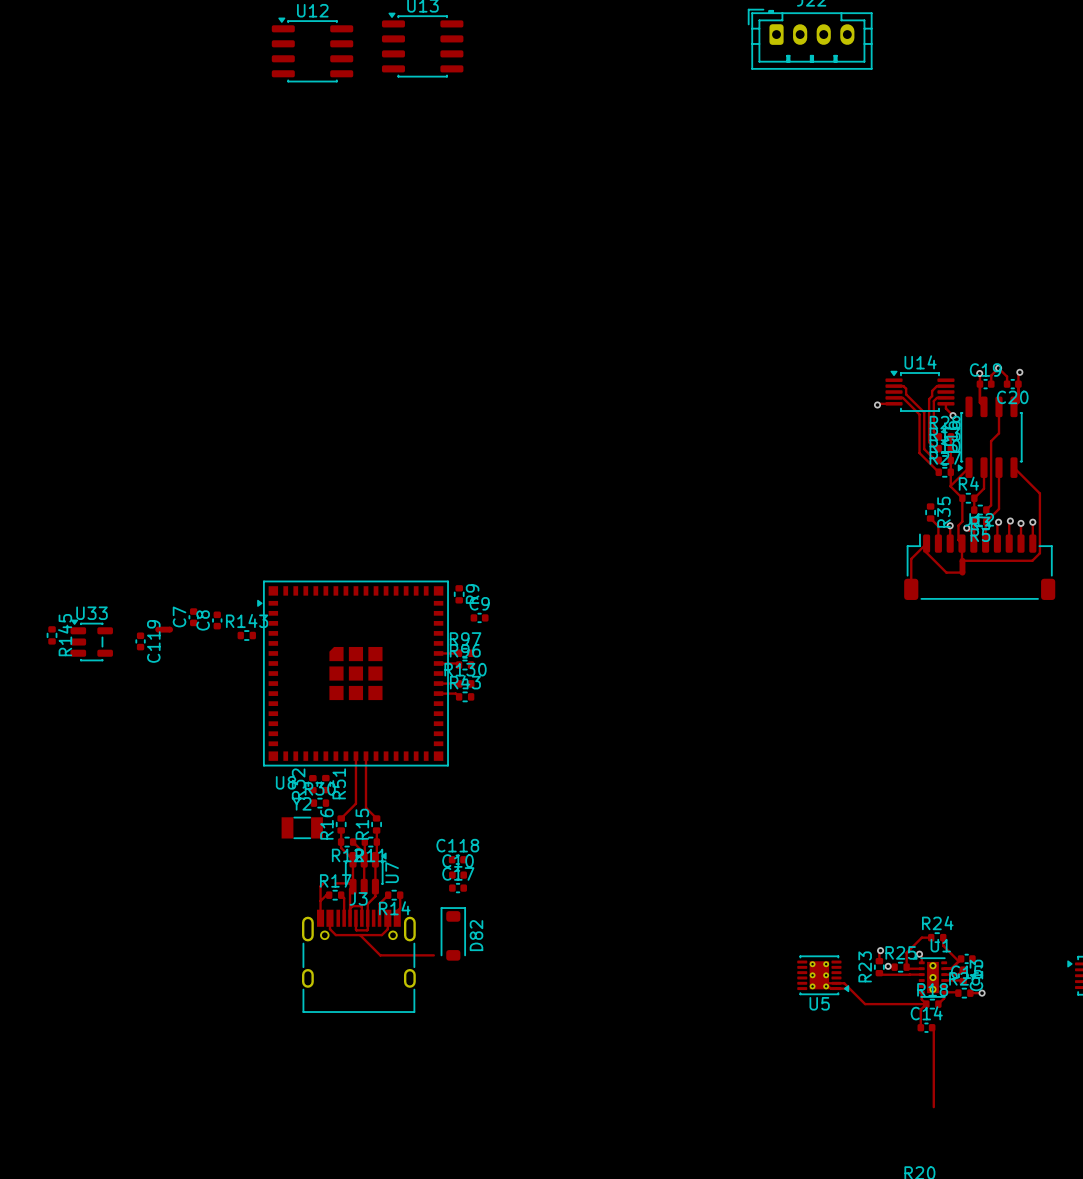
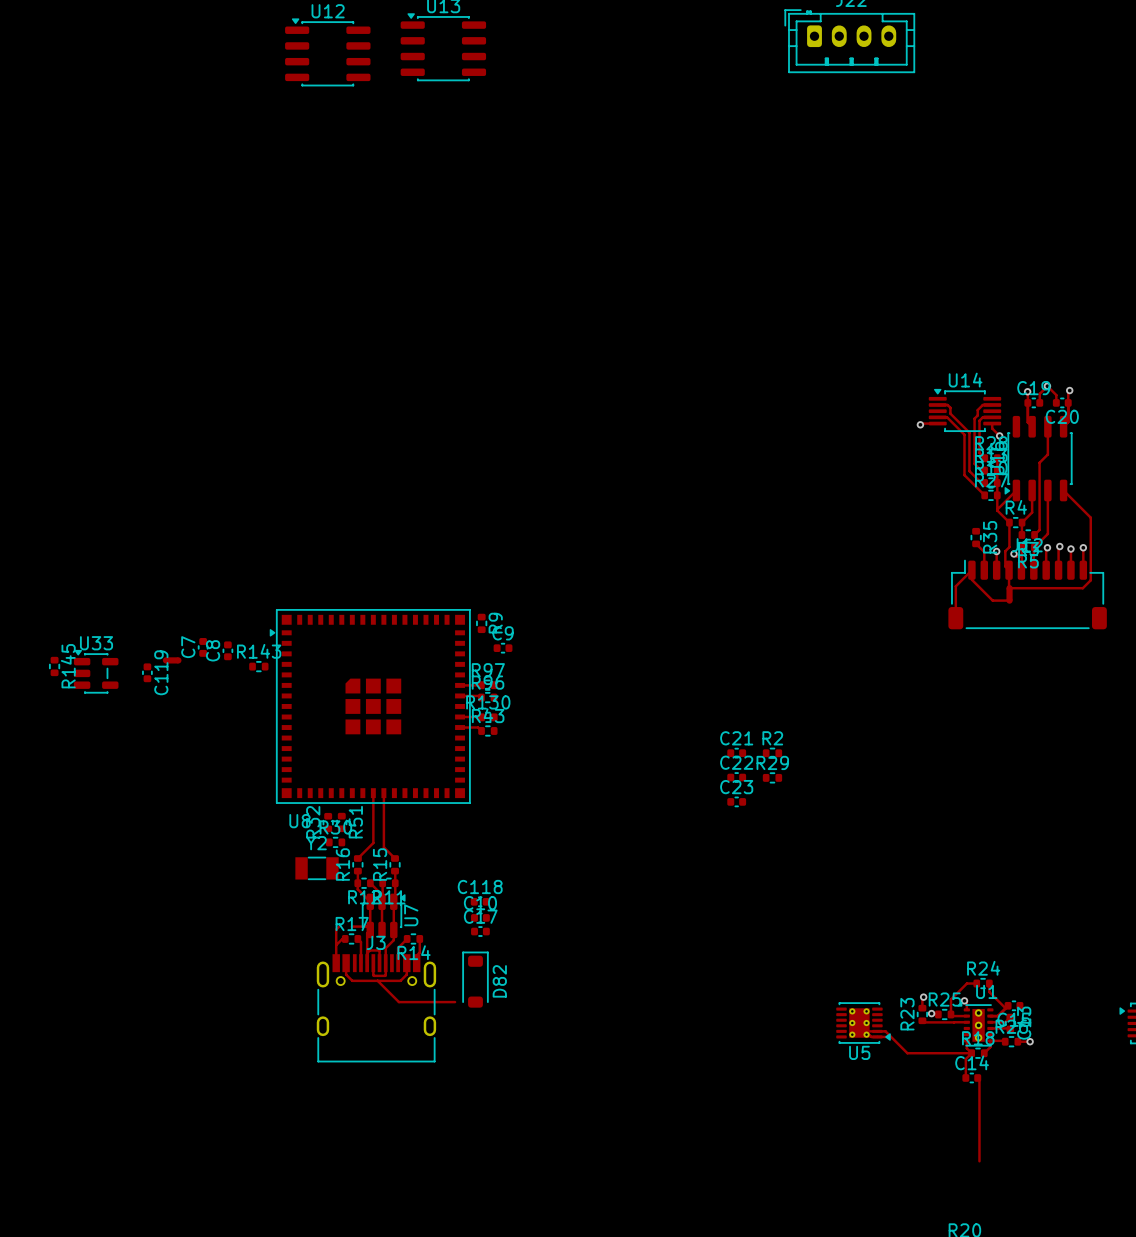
C21: none -> (736, 753)
R2: none -> (772, 753)
C22: none -> (736, 777)
R29: none -> (772, 777)
C23: none -> (736, 801)

